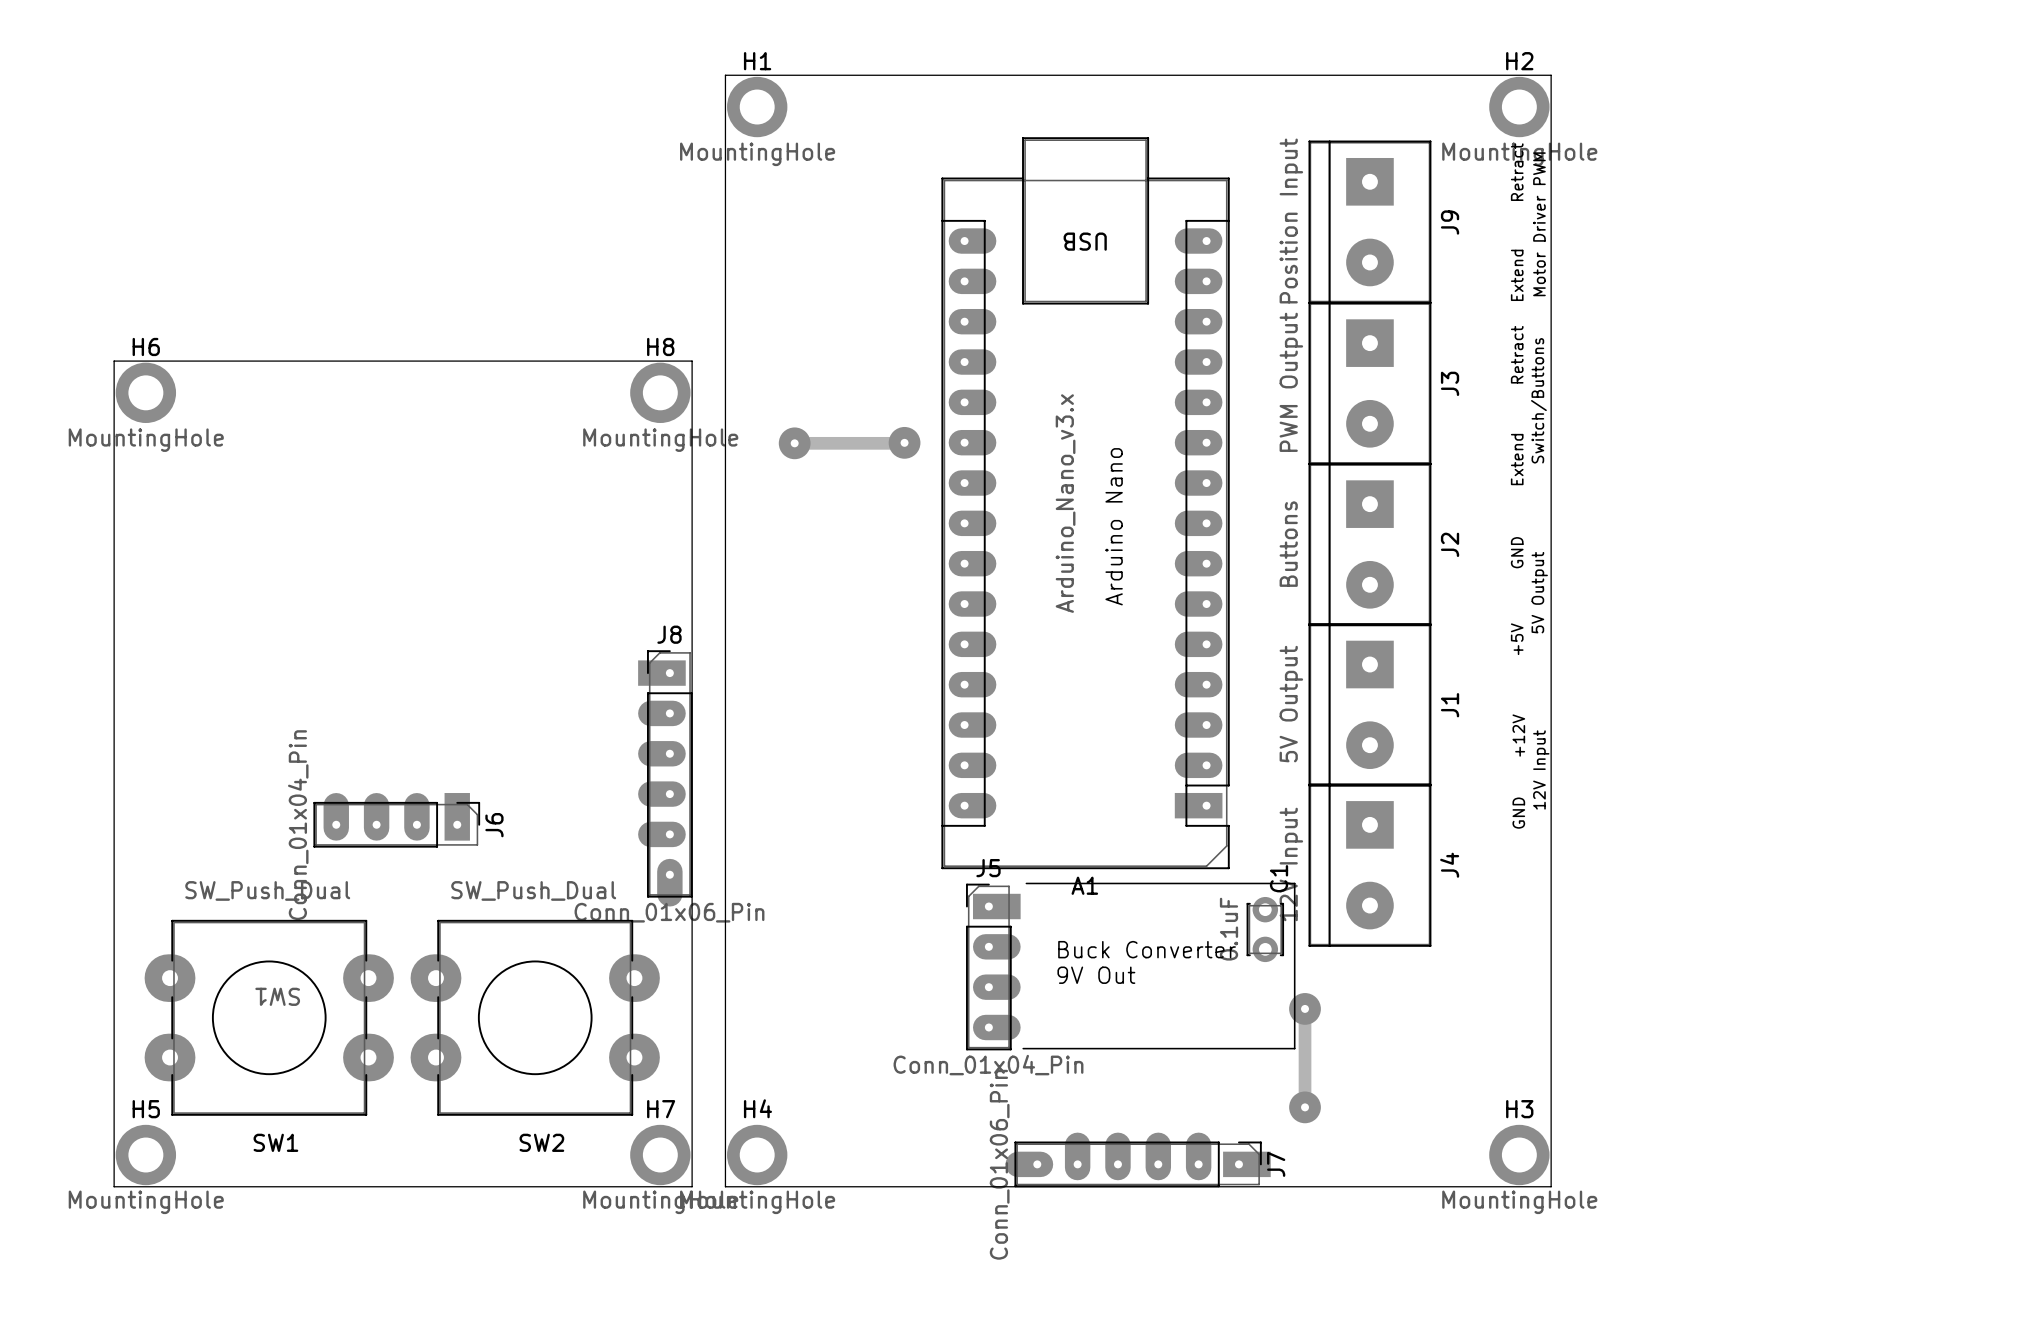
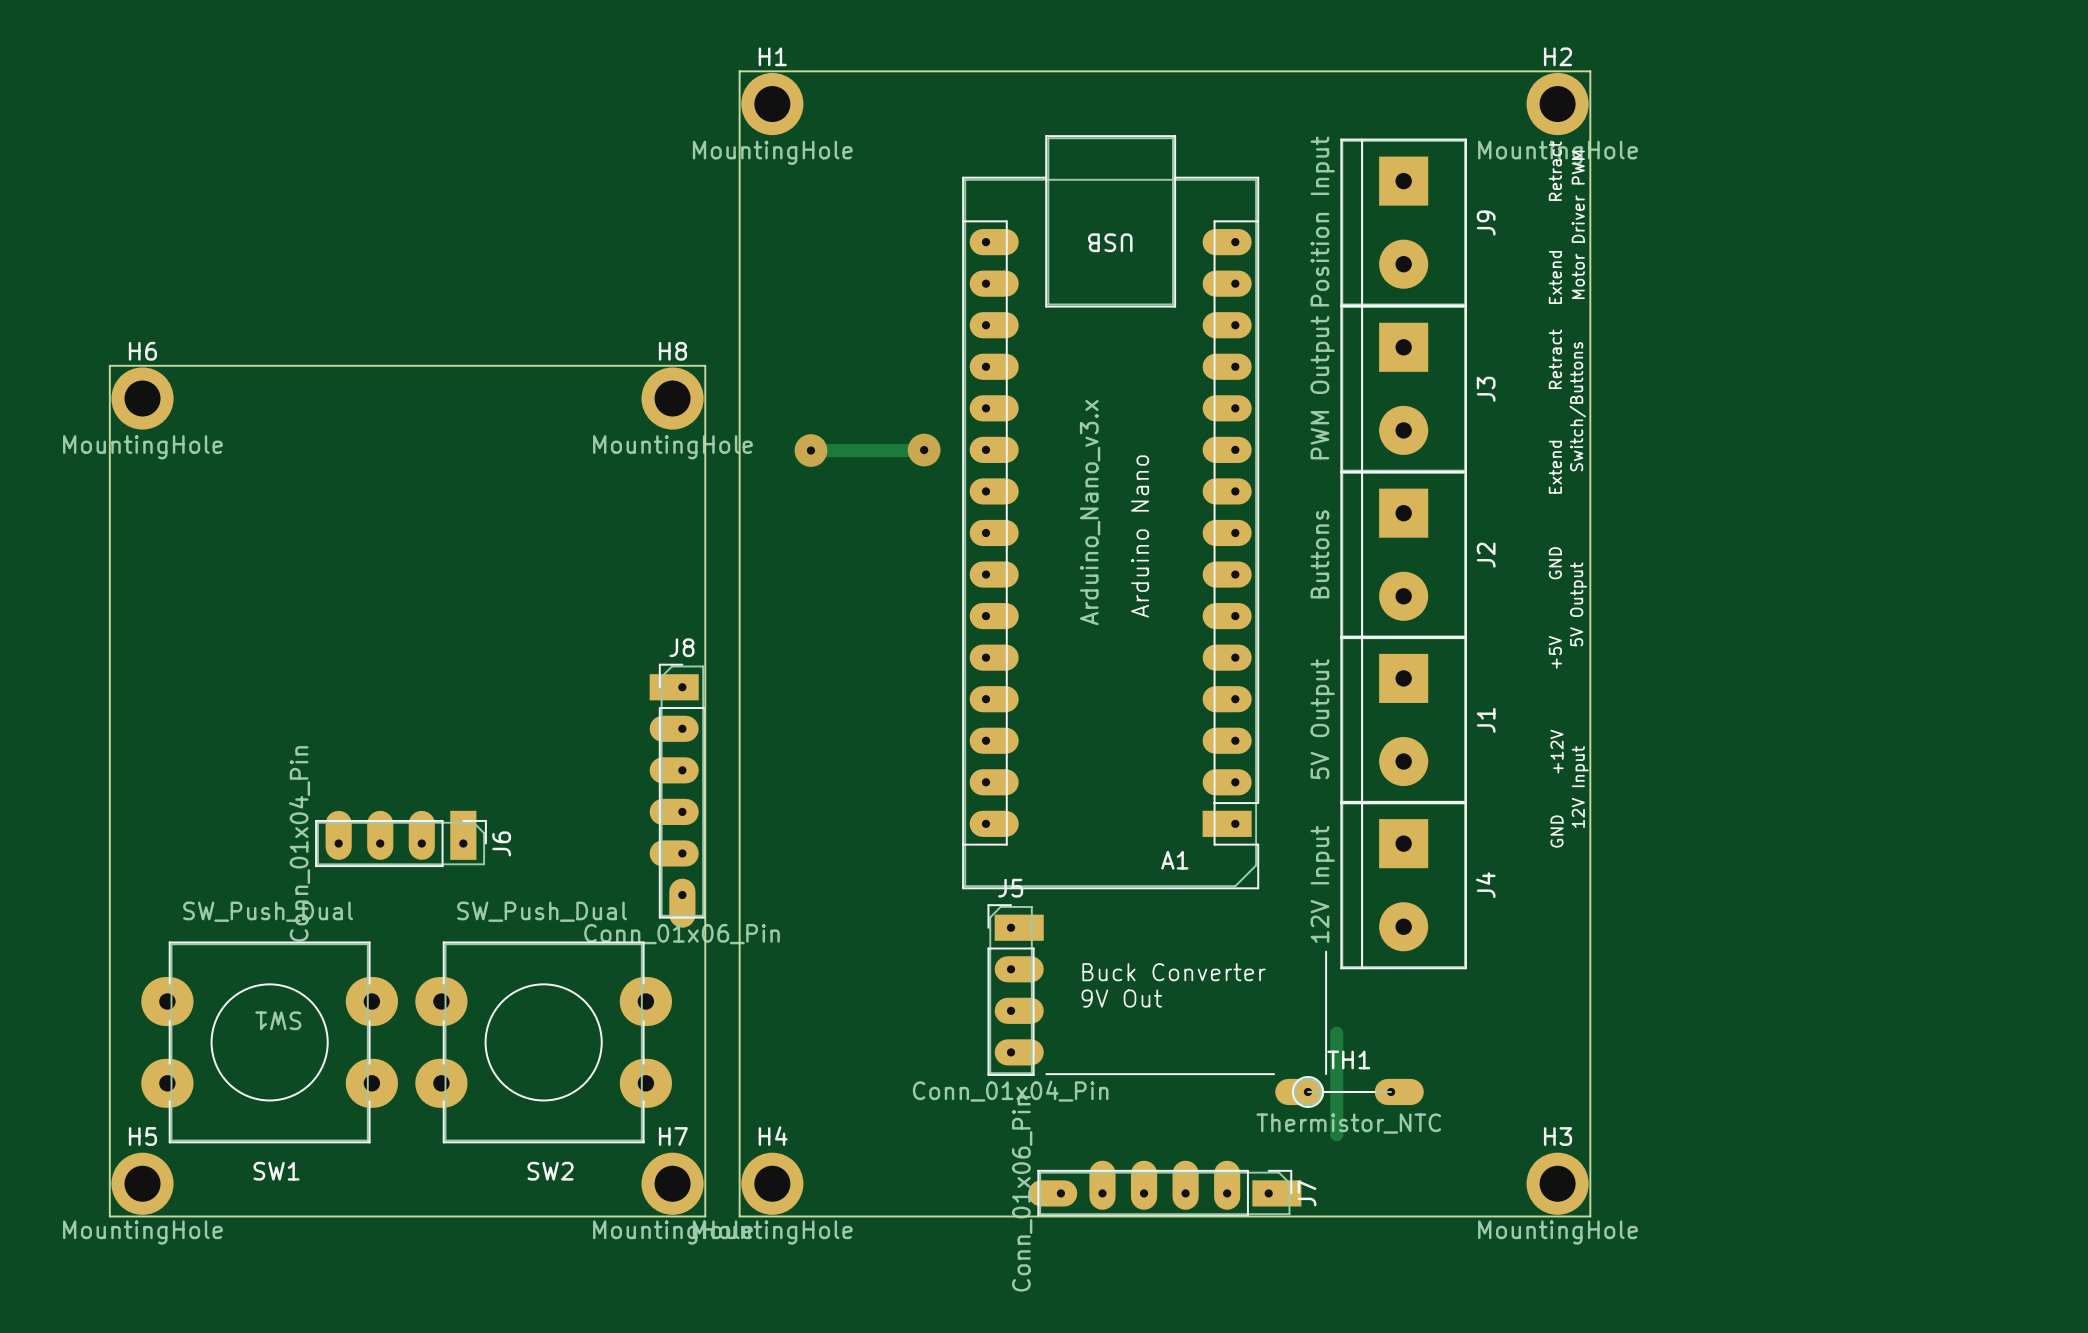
line: (1026, 883) (1294, 883) (1294, 929) -> none
A1 name position: A1 (1084, 885) -> A1 (1174, 860)
C1: 0.1uF (1265, 929) -> none
via: (1305, 1008) -> none
line: (1244, 1048) (1294, 1048) -> none
TH1: none -> Thermistor_NTC (1349, 1091)
via: (1305, 1107) -> none

